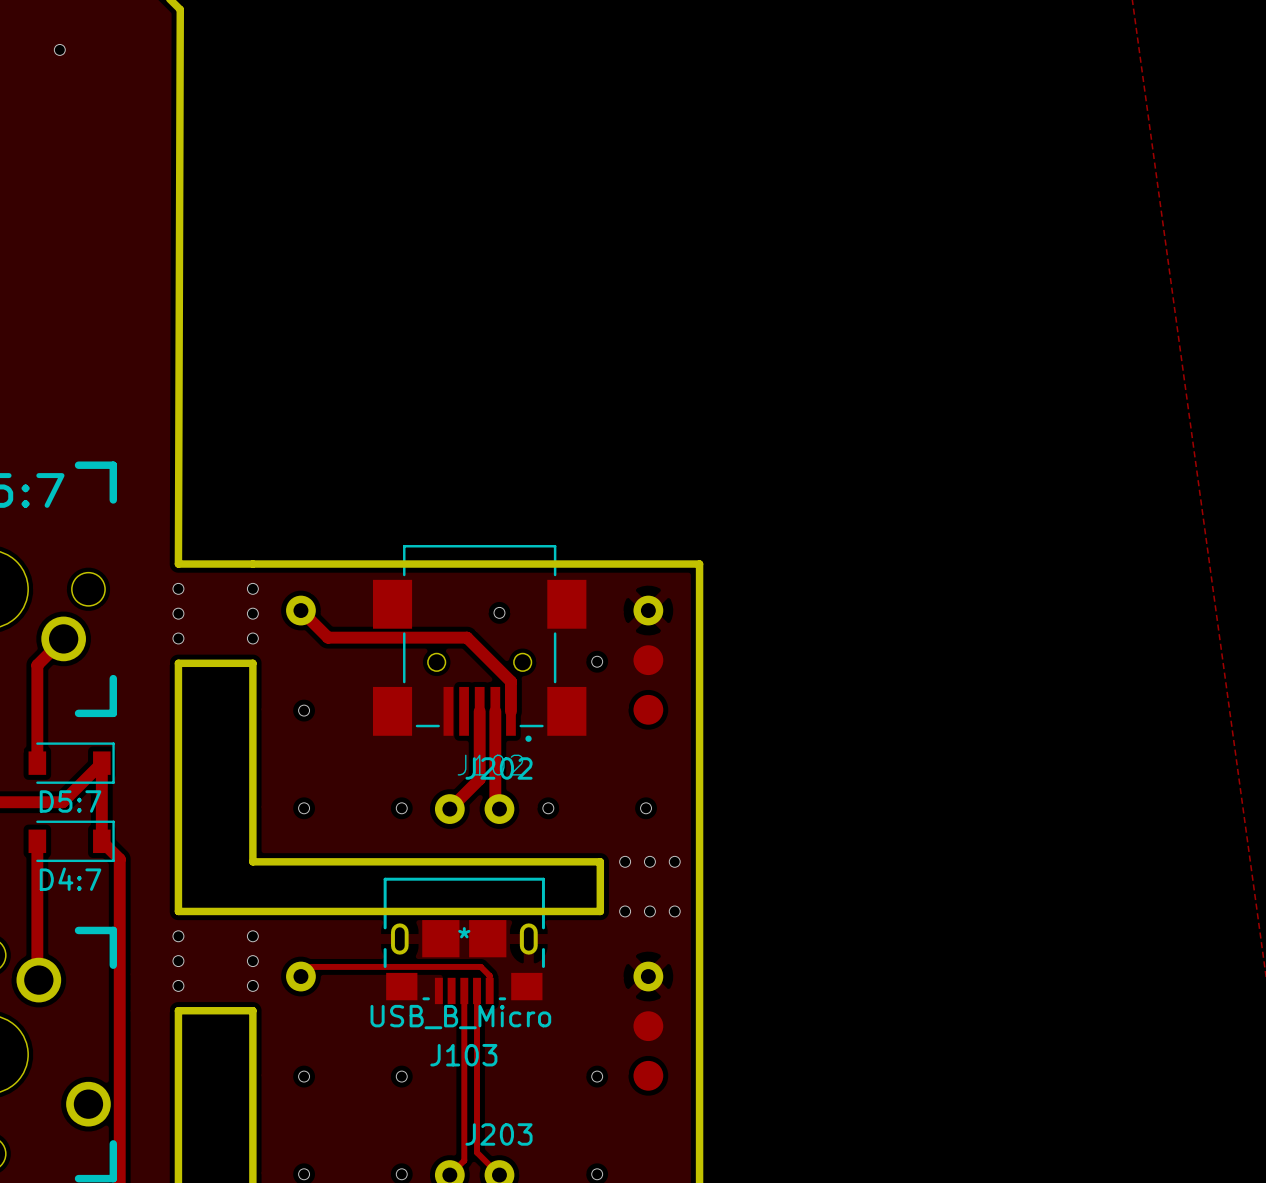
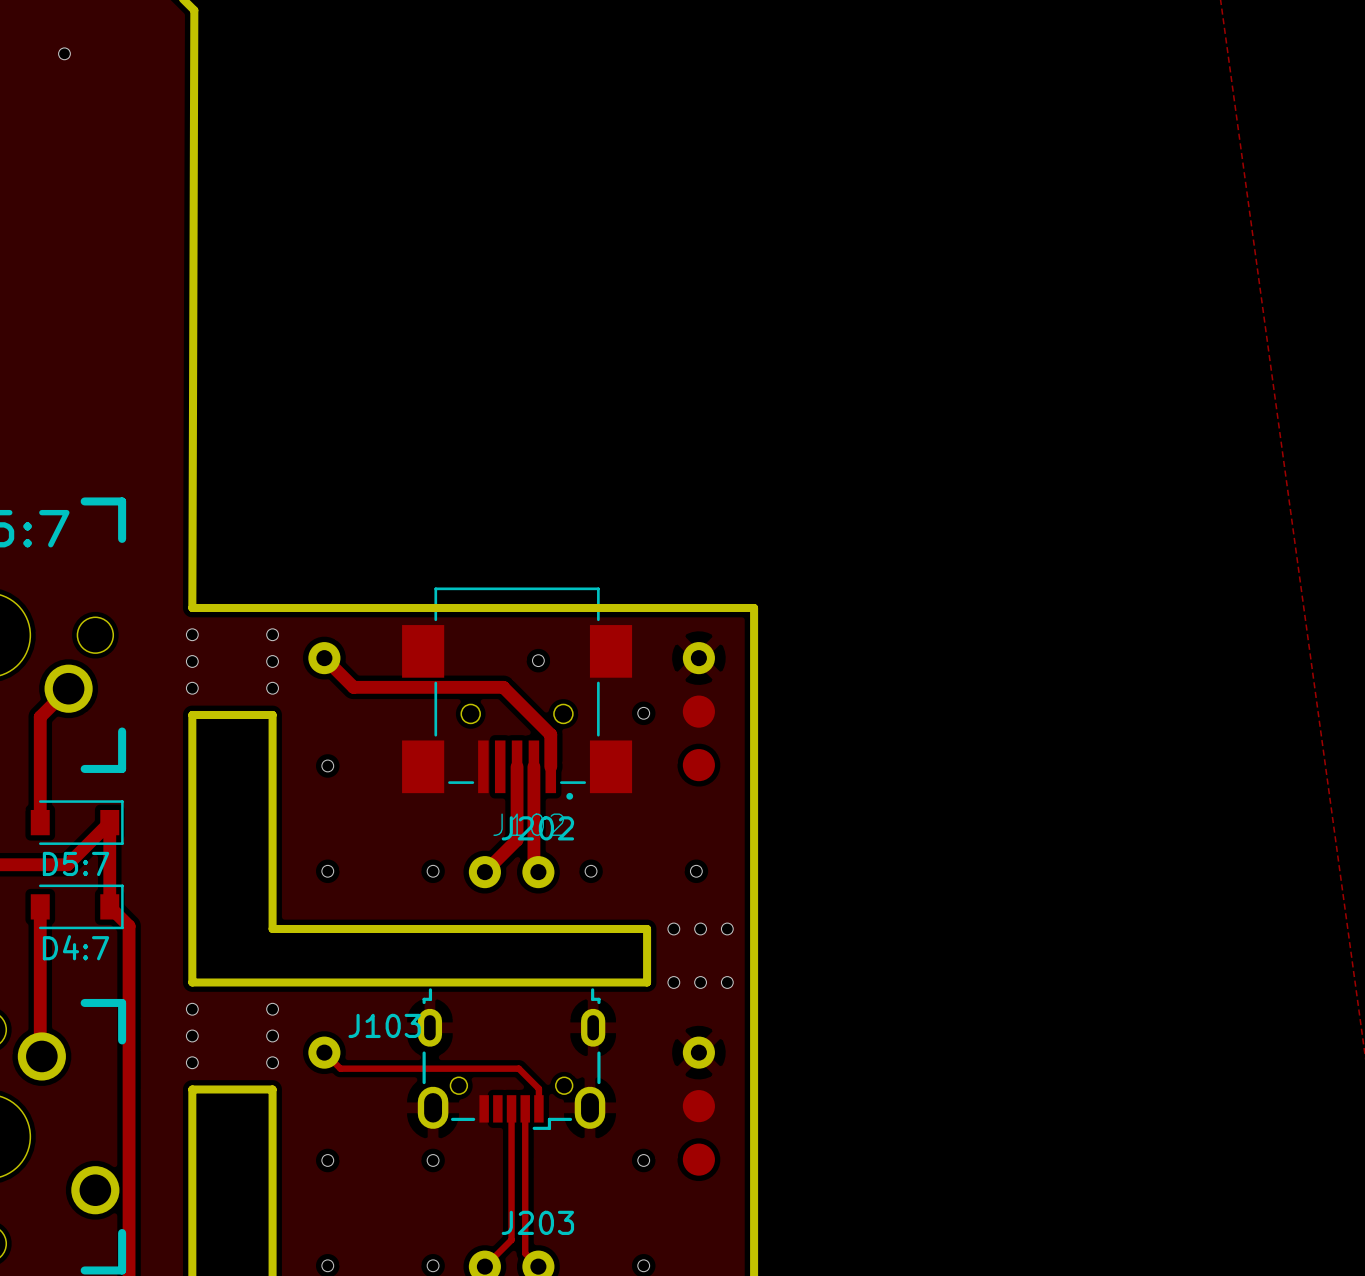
J103 footprint: [383, 877, 545, 1005] -> [417, 988, 606, 1130]
track: (300, 976) (310, 966) (480, 966) (489, 975) (489, 990) -> none
track: none -> (331, 1059) (340, 1068) (518, 1068) (538, 1088) (538, 1108)
track: (464, 990) (464, 1160) -> (511, 1108) (511, 1239) (500, 1251)
track: (477, 990) (477, 1152) (487, 1162) -> (525, 1108) (525, 1253)
J103 value: USB_B_Micro (460, 1017) -> none
J103 name position: J103 (463, 1055) -> J103 (384, 1025)

